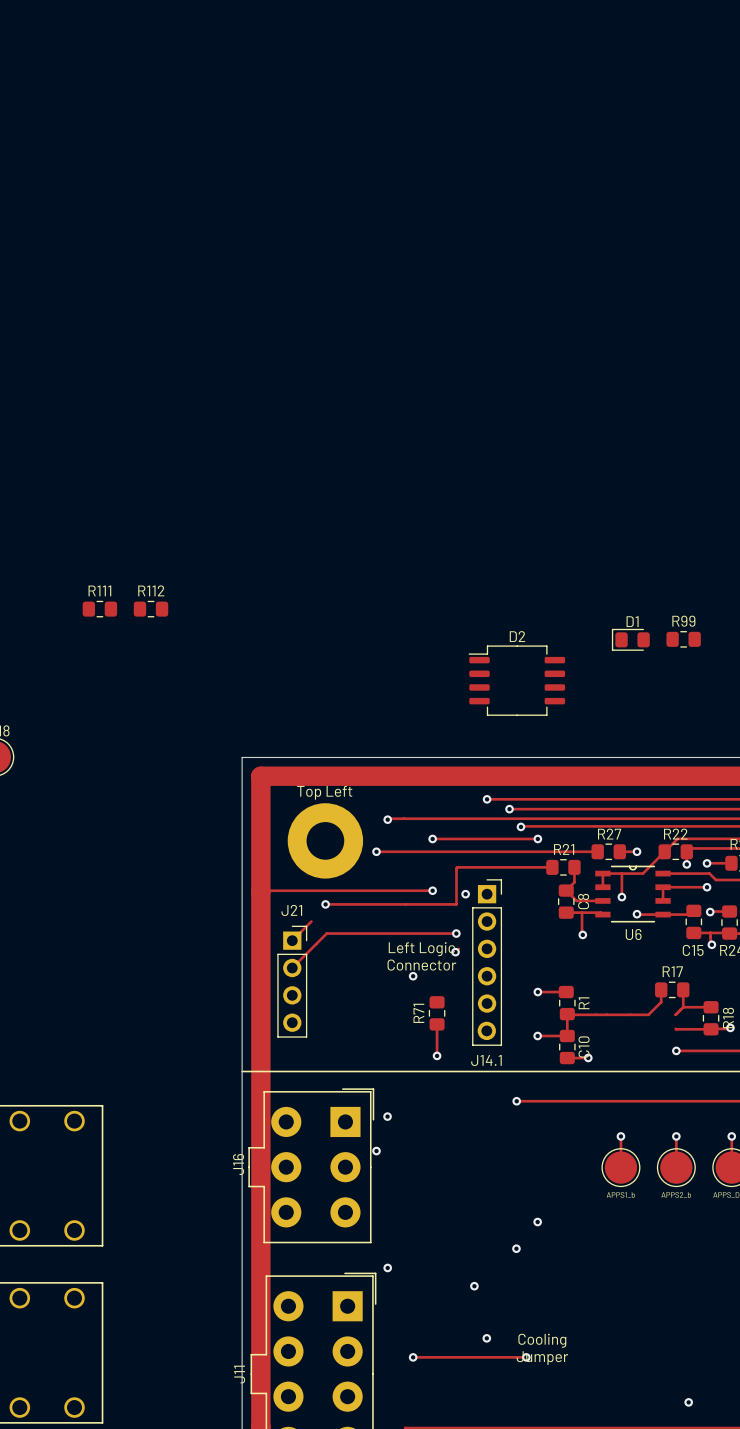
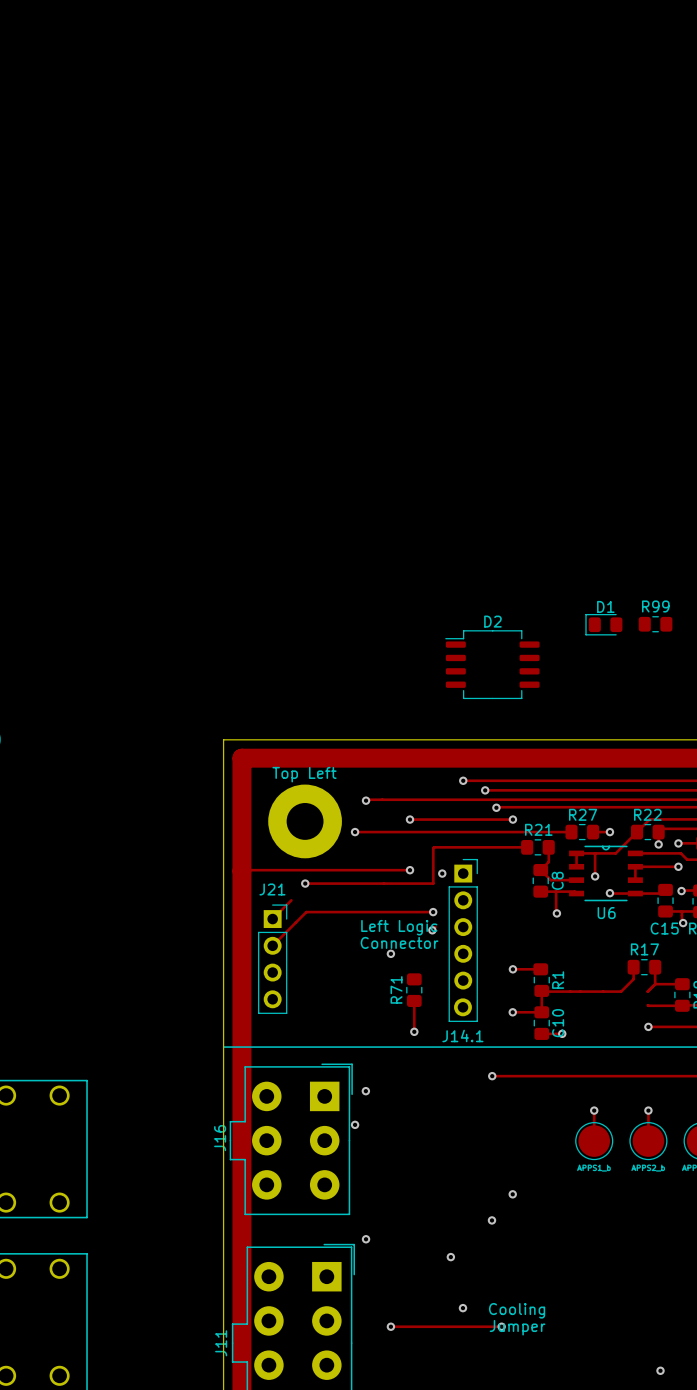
R111: (99, 609) -> none
R112: (151, 609) -> none

